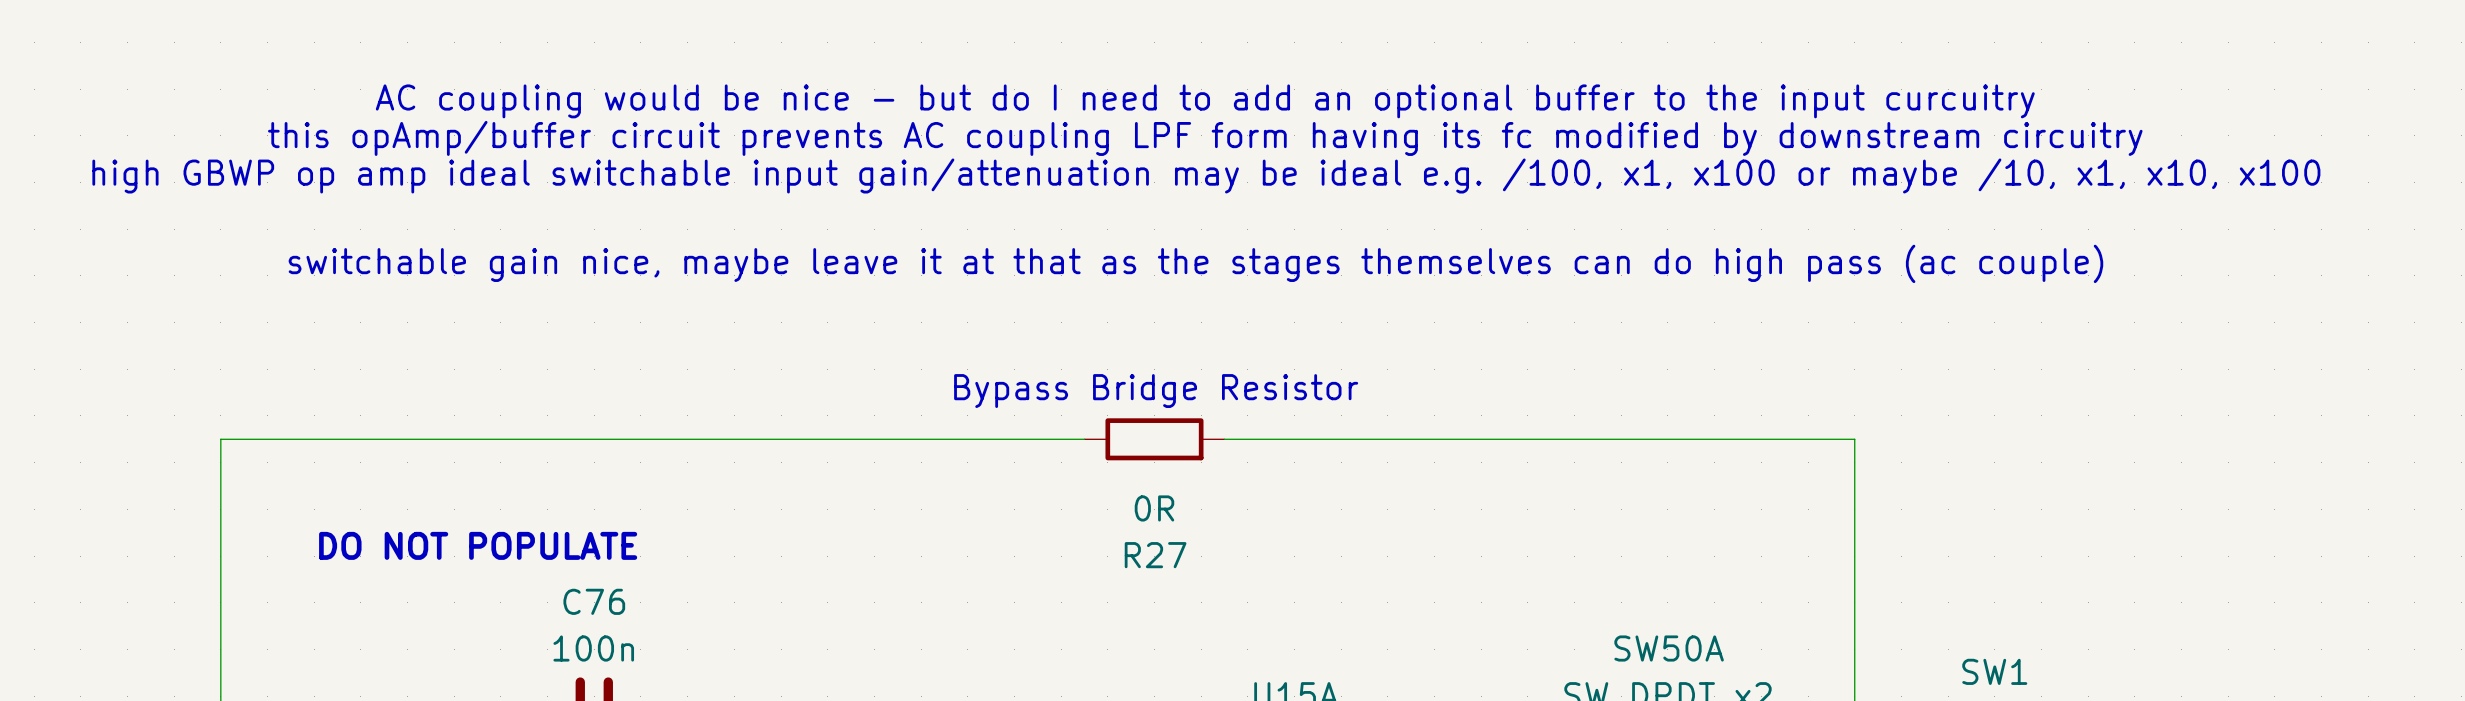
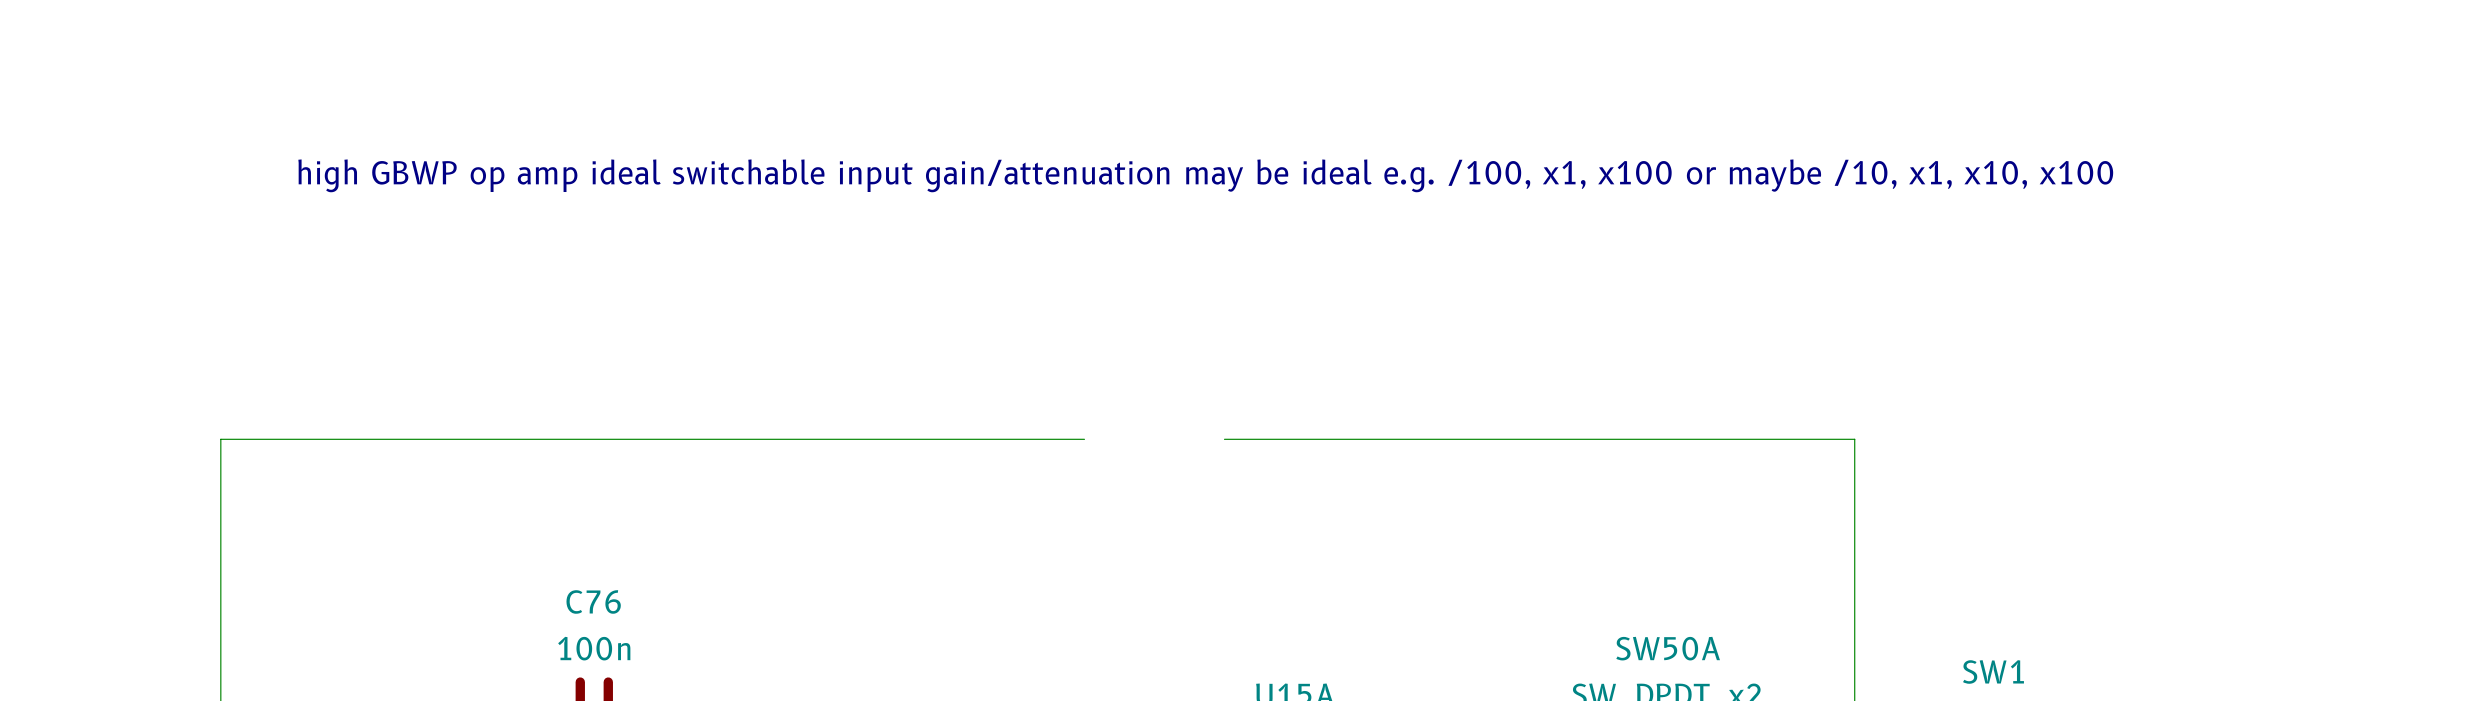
text: AC coupling would be nice - but do I need to add an optional buffer to the input curcuitry (1205, 101) -> none
text: this opAmp/buffer circuit prevents AC coupling LPF form having its fc modified by downstream circuitry (1205, 138) -> none
text: switchable gain nice, maybe leave it at that as the stages themselves can do high pass (ac couple) (1195, 263) -> none
text: Bypass Bridge Resistor (1156, 391) -> none
R27: 0R (1154, 439) -> none
text: DO NOT POPULATE (478, 545) -> none

